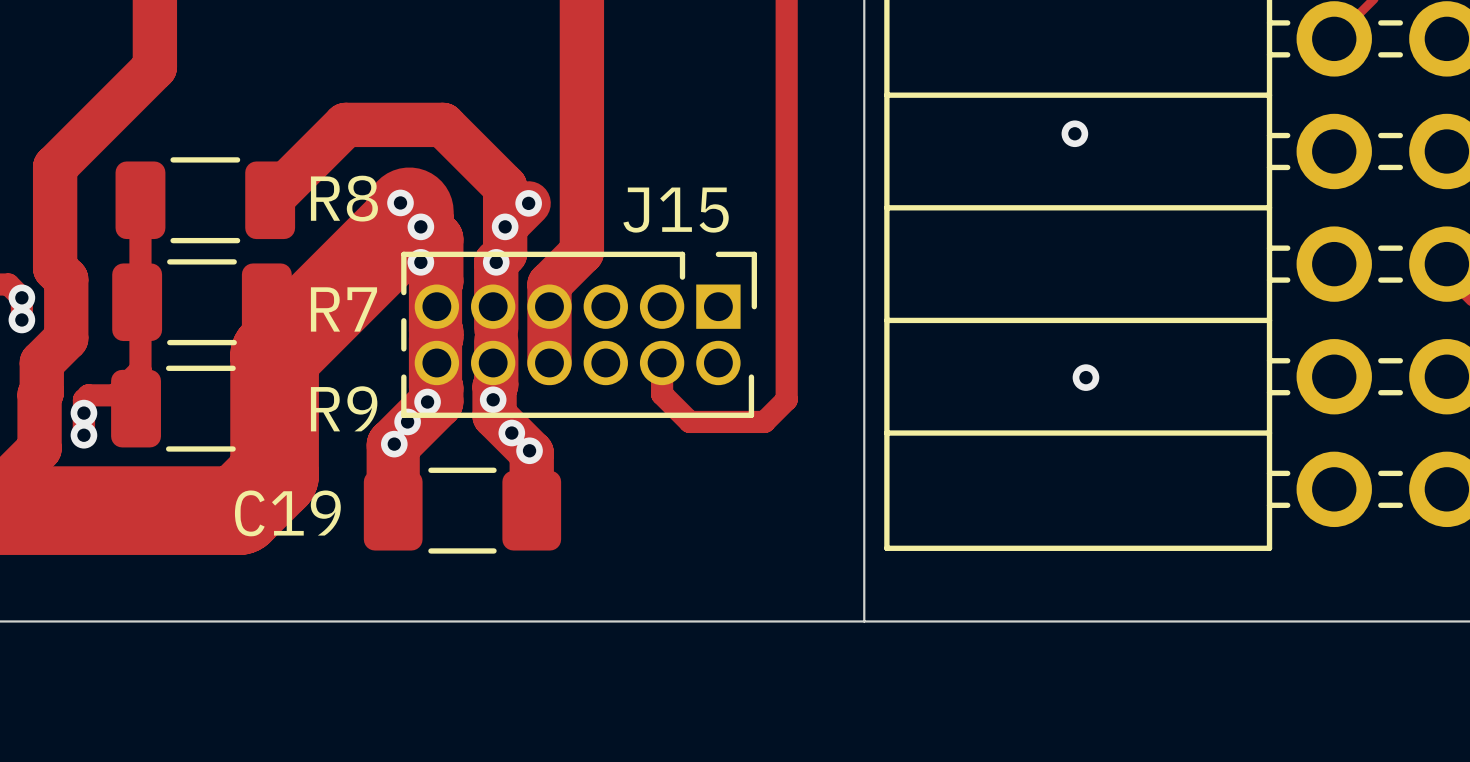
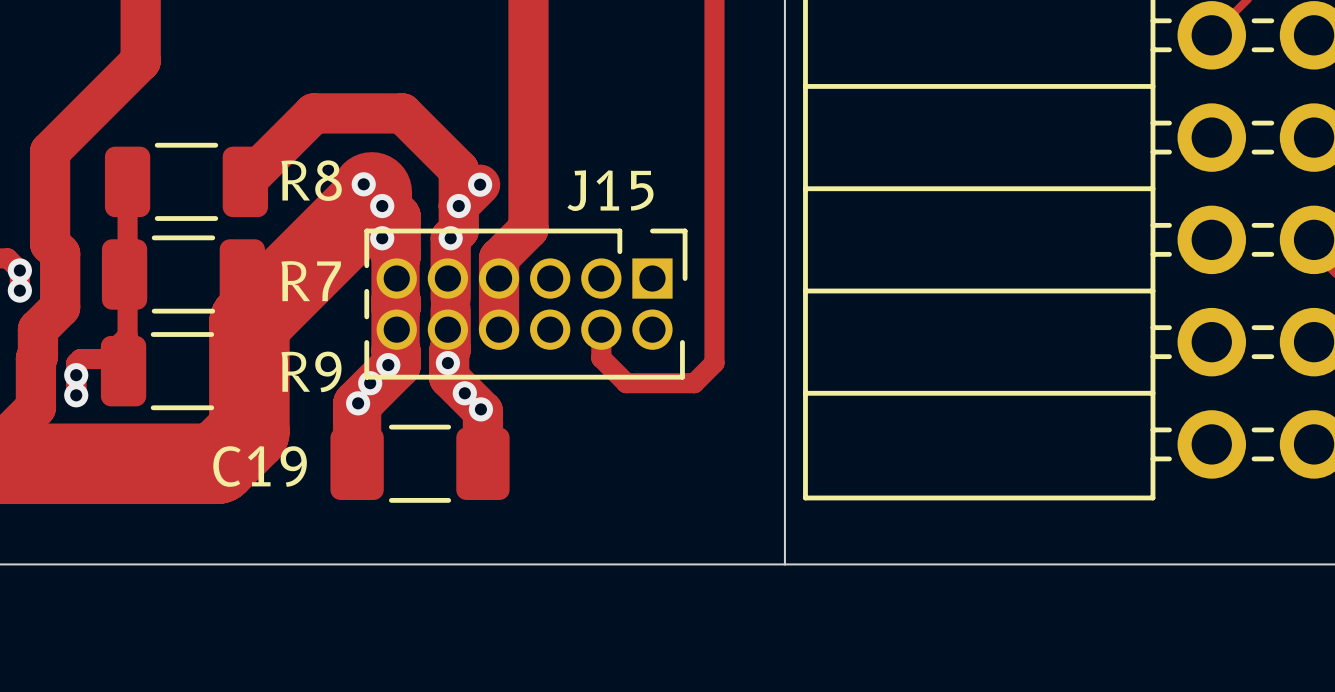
via: (1074, 133) -> none
via: (1085, 377) -> none

